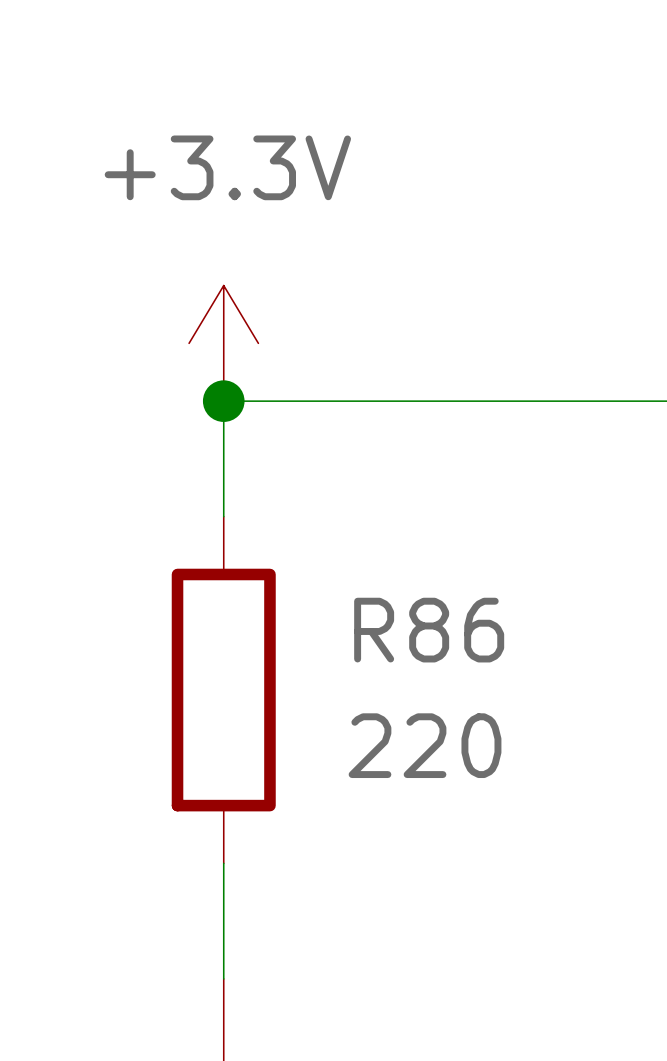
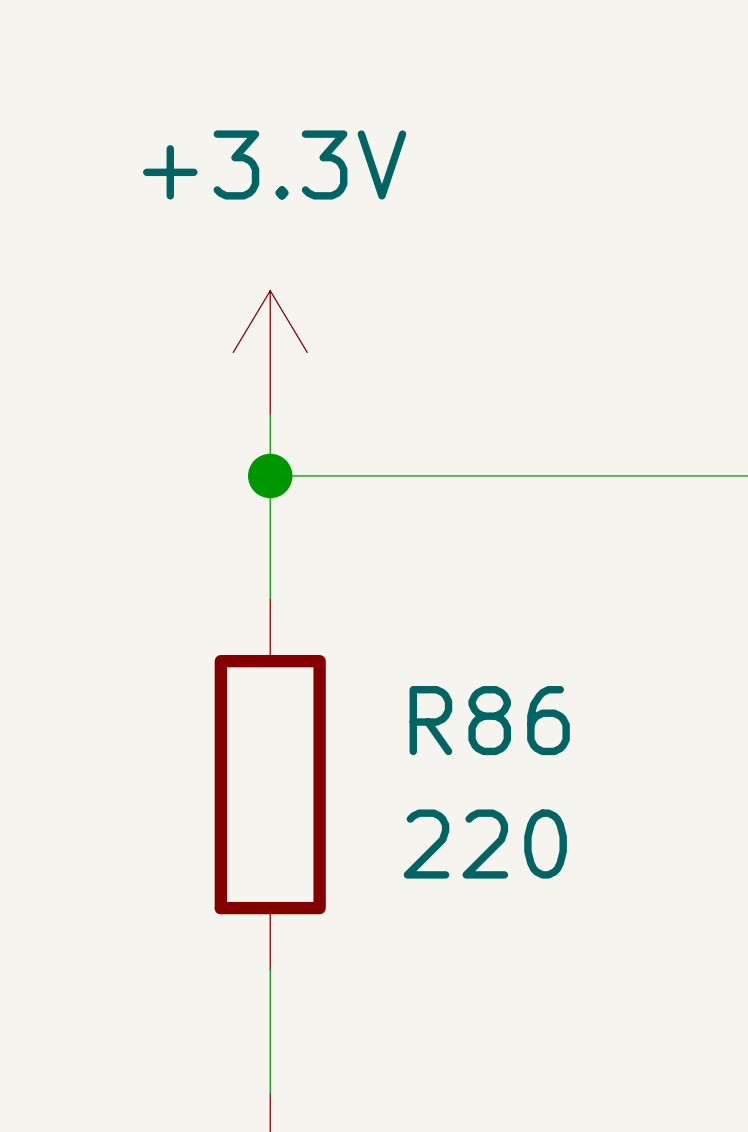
power symbol position: +3.3V (223, 343) -> +3.3V (270, 352)

